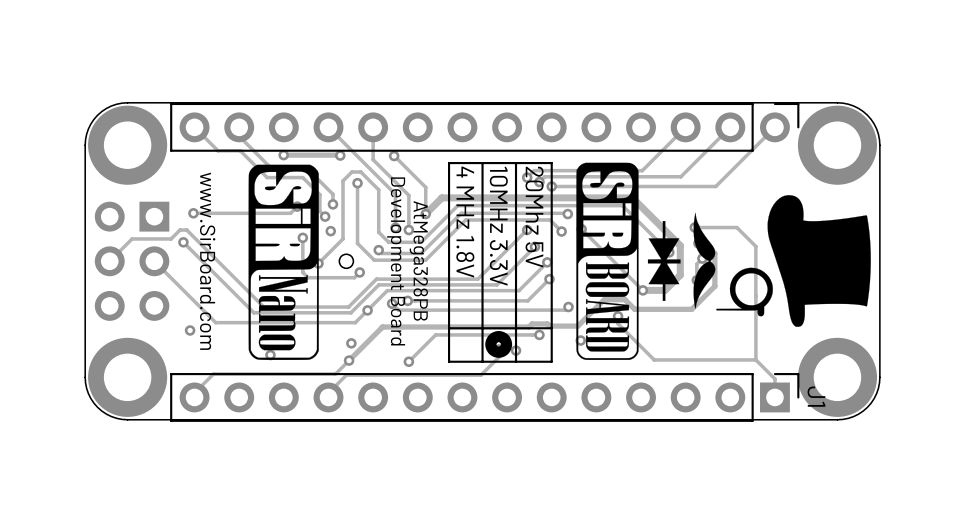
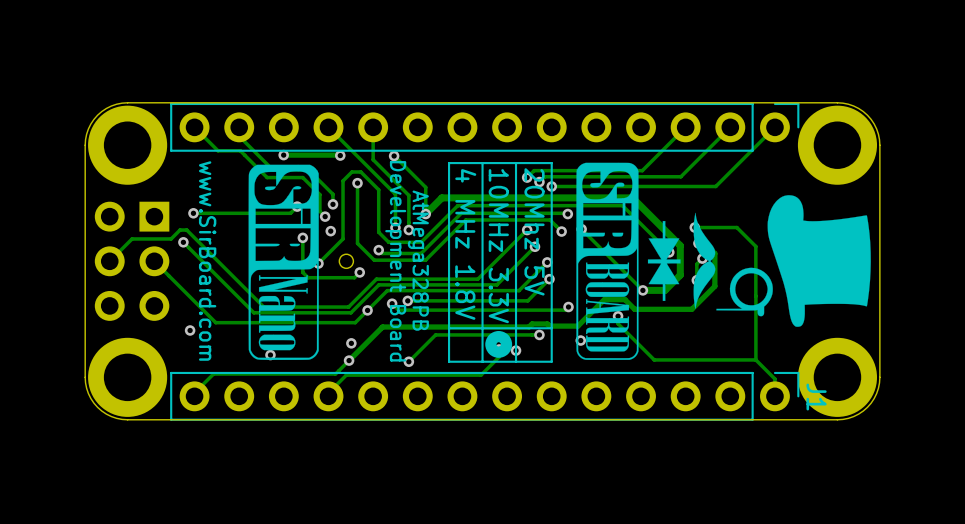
J1 footprint: [170, 373, 800, 422] -> [170, 371, 800, 421]

